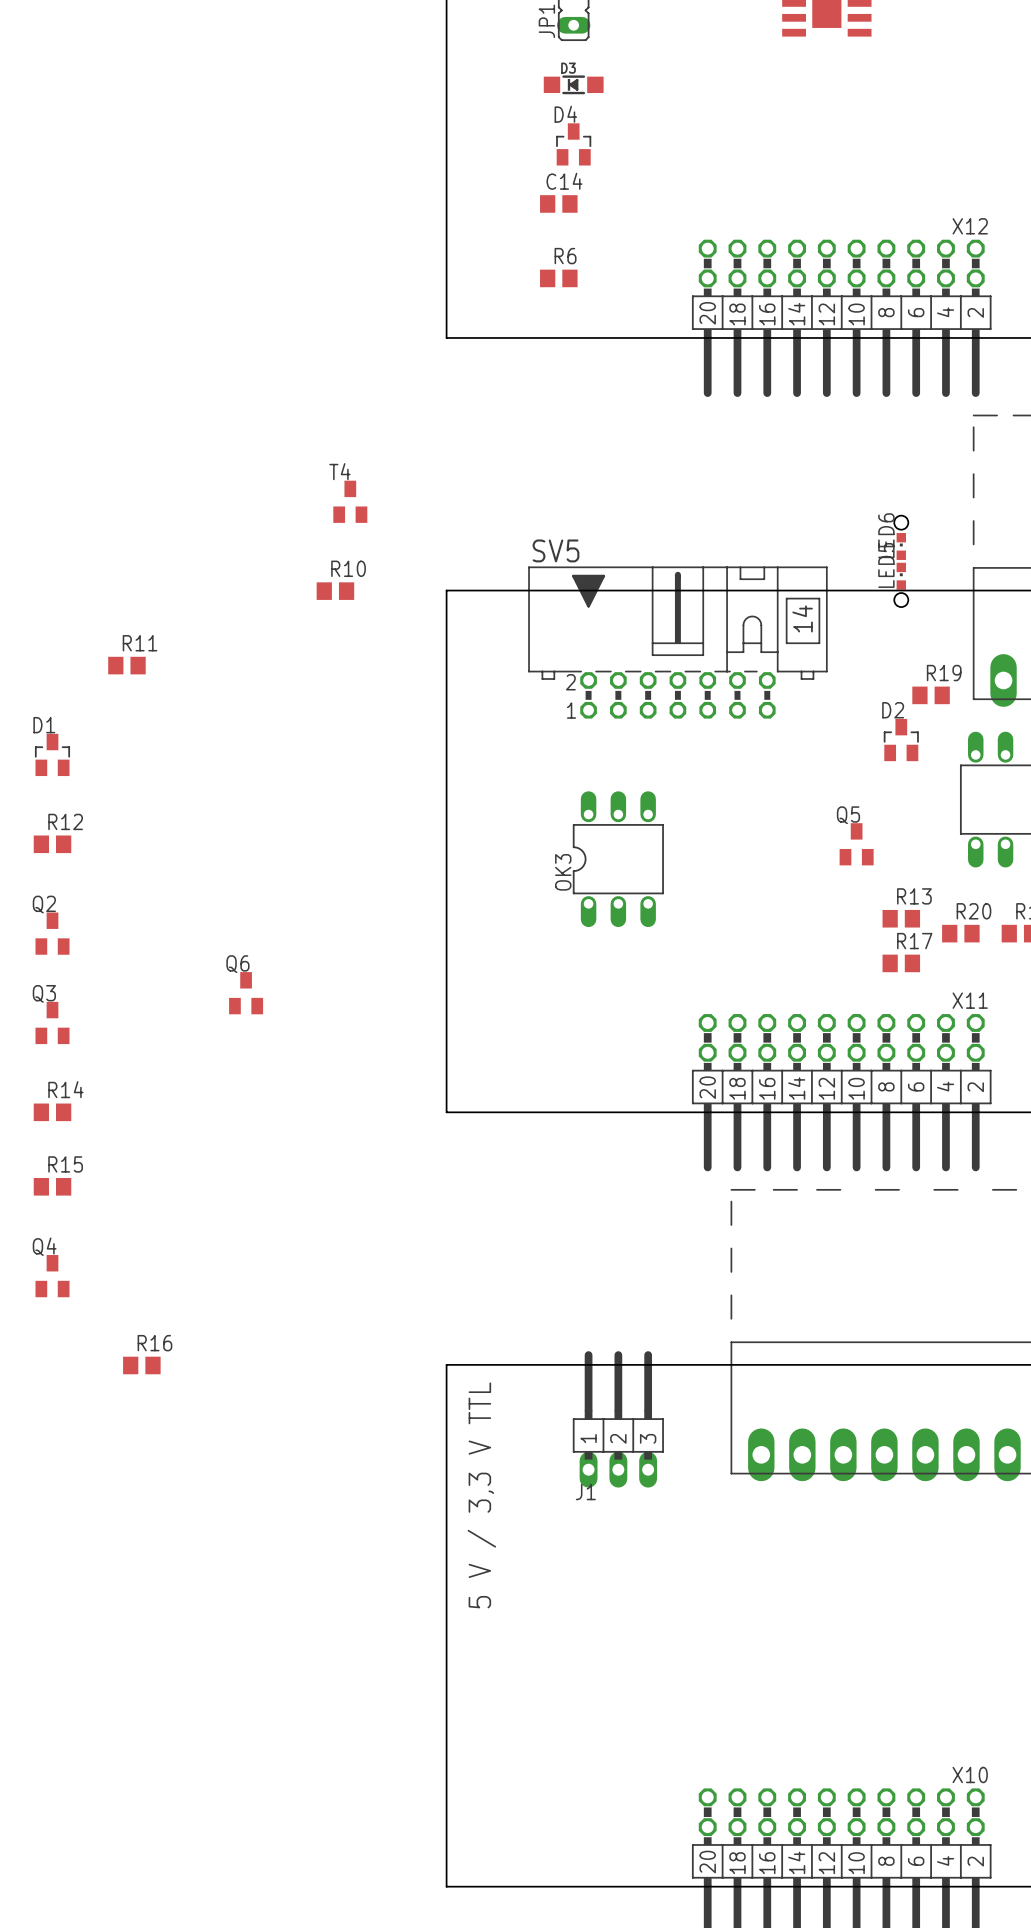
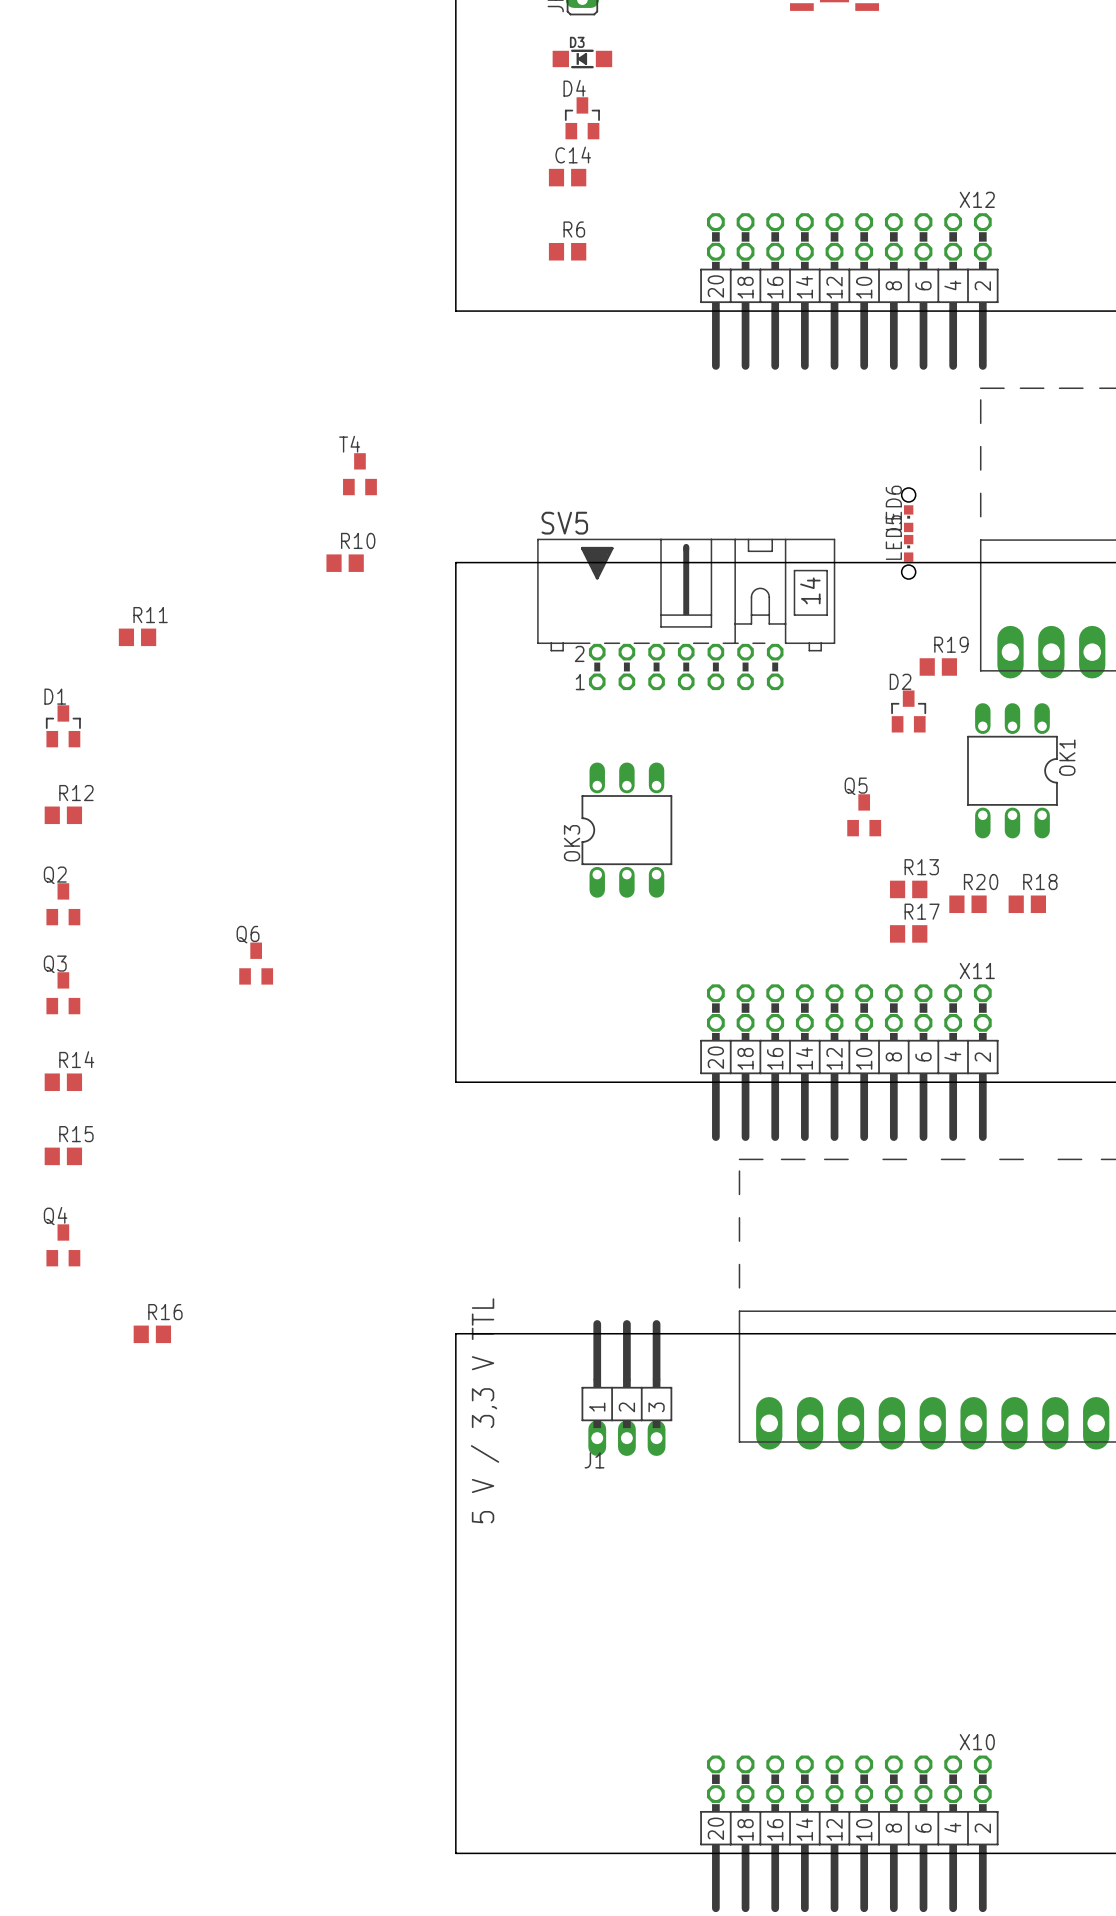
text position: 5 V / 3,3 V TTL (481, 1495) -> 5 V / 3,3 V TTL (485, 1410)

